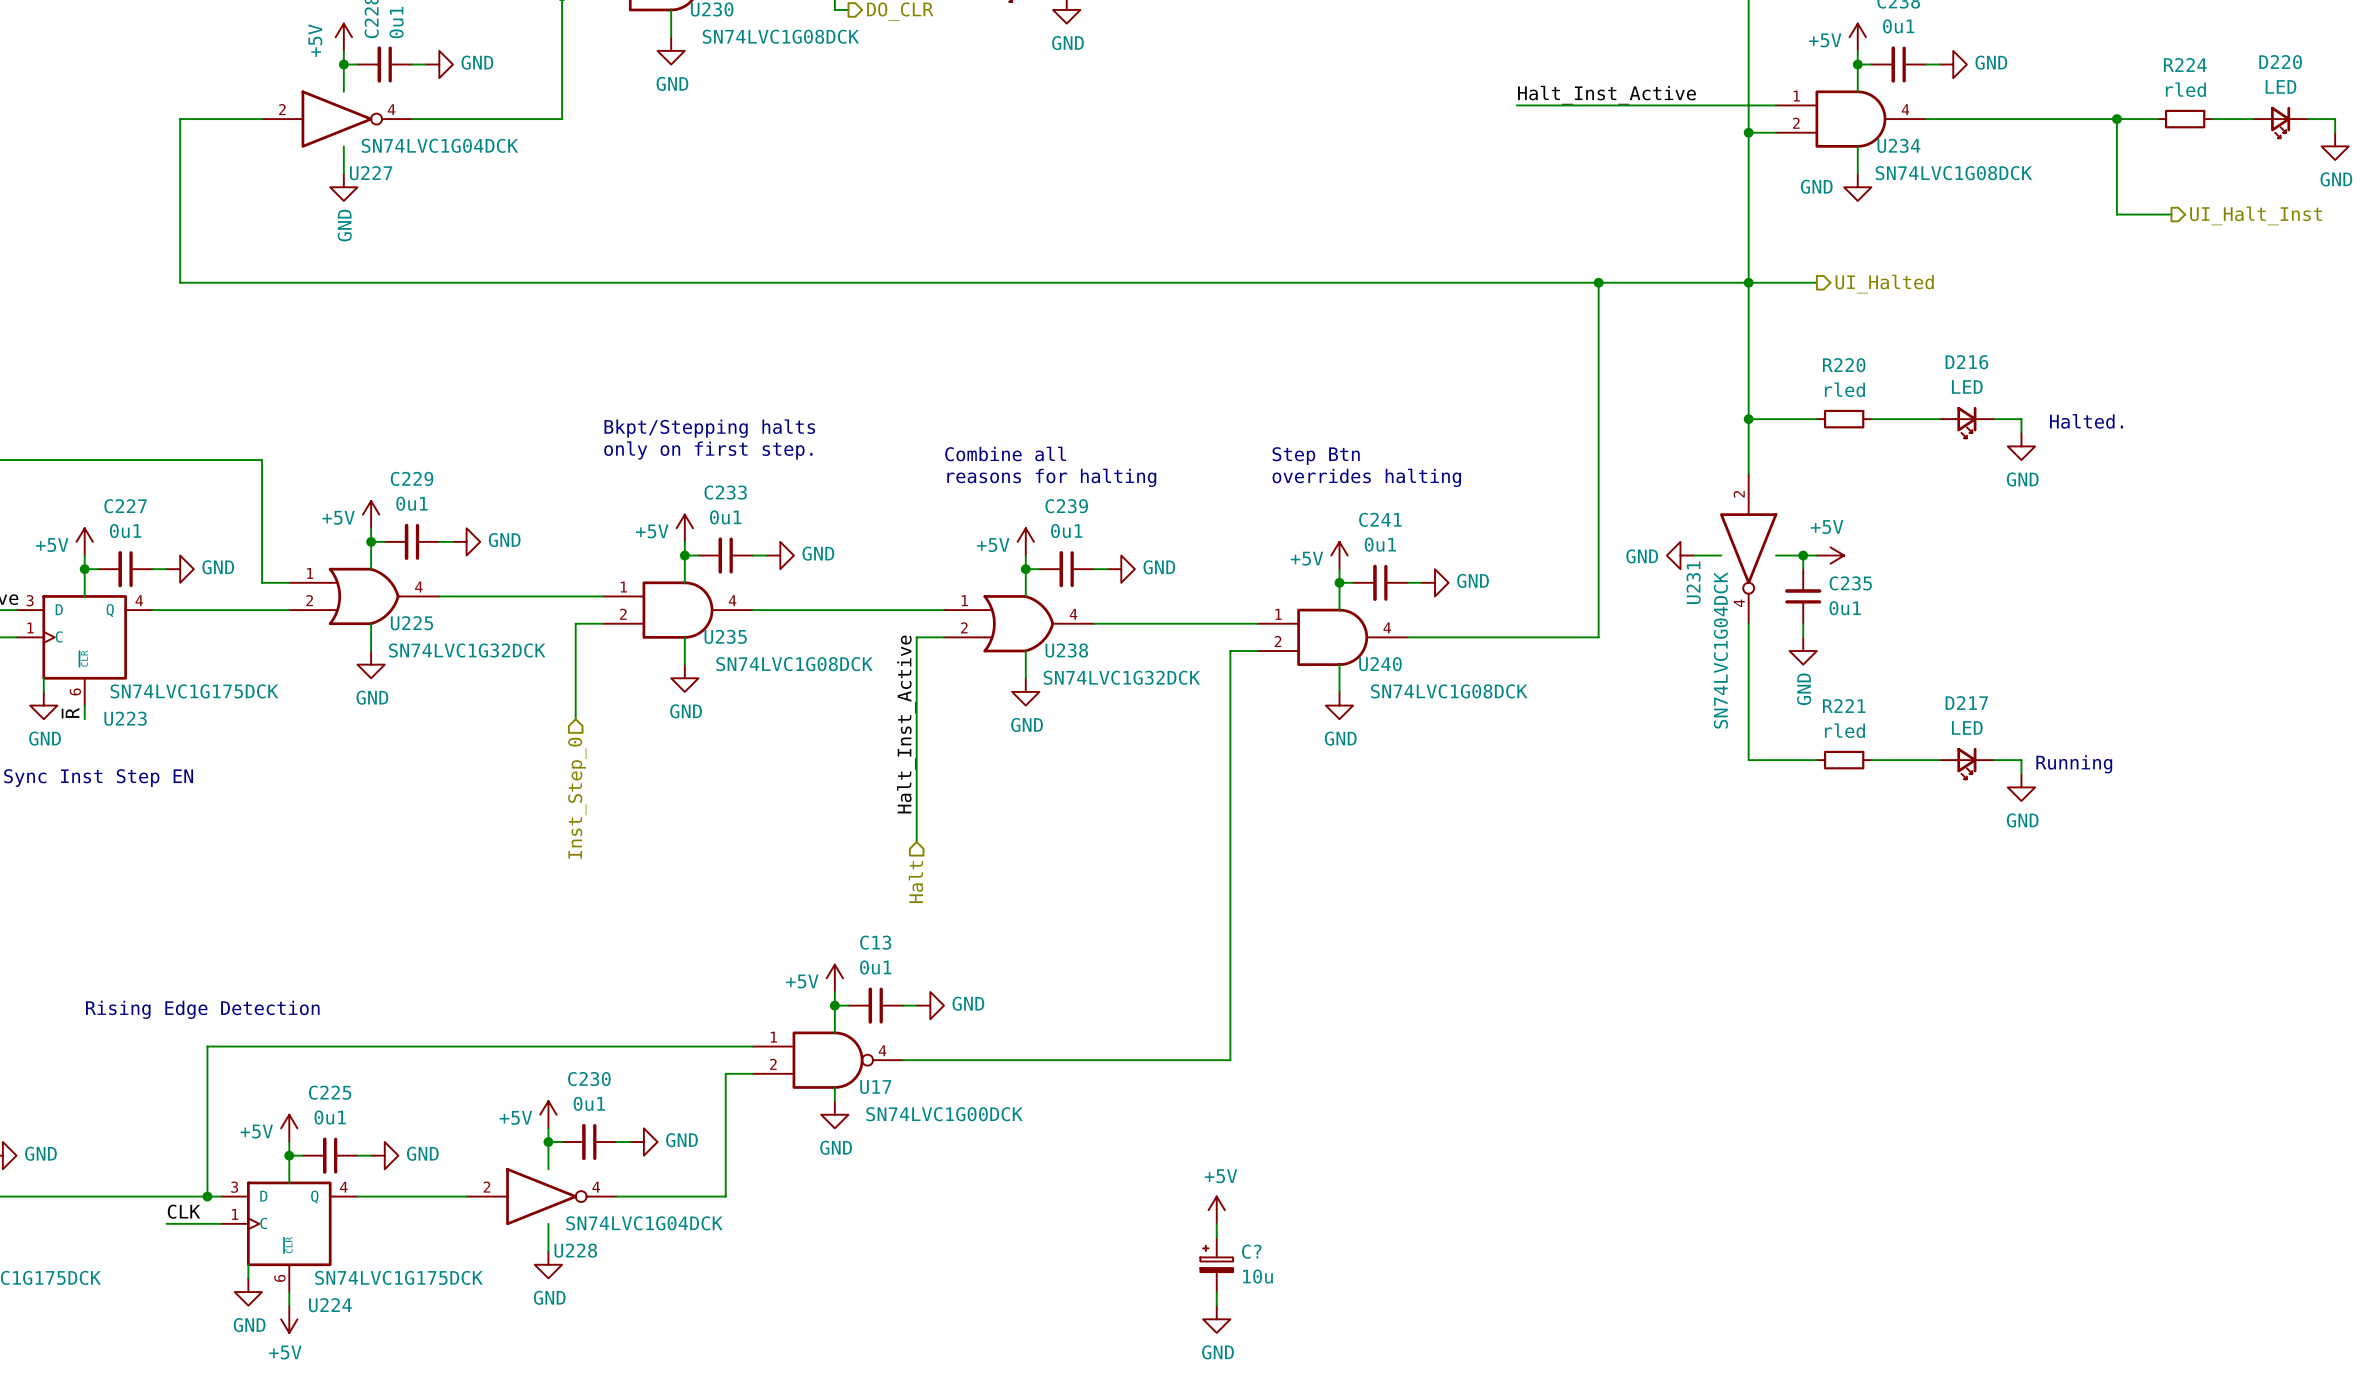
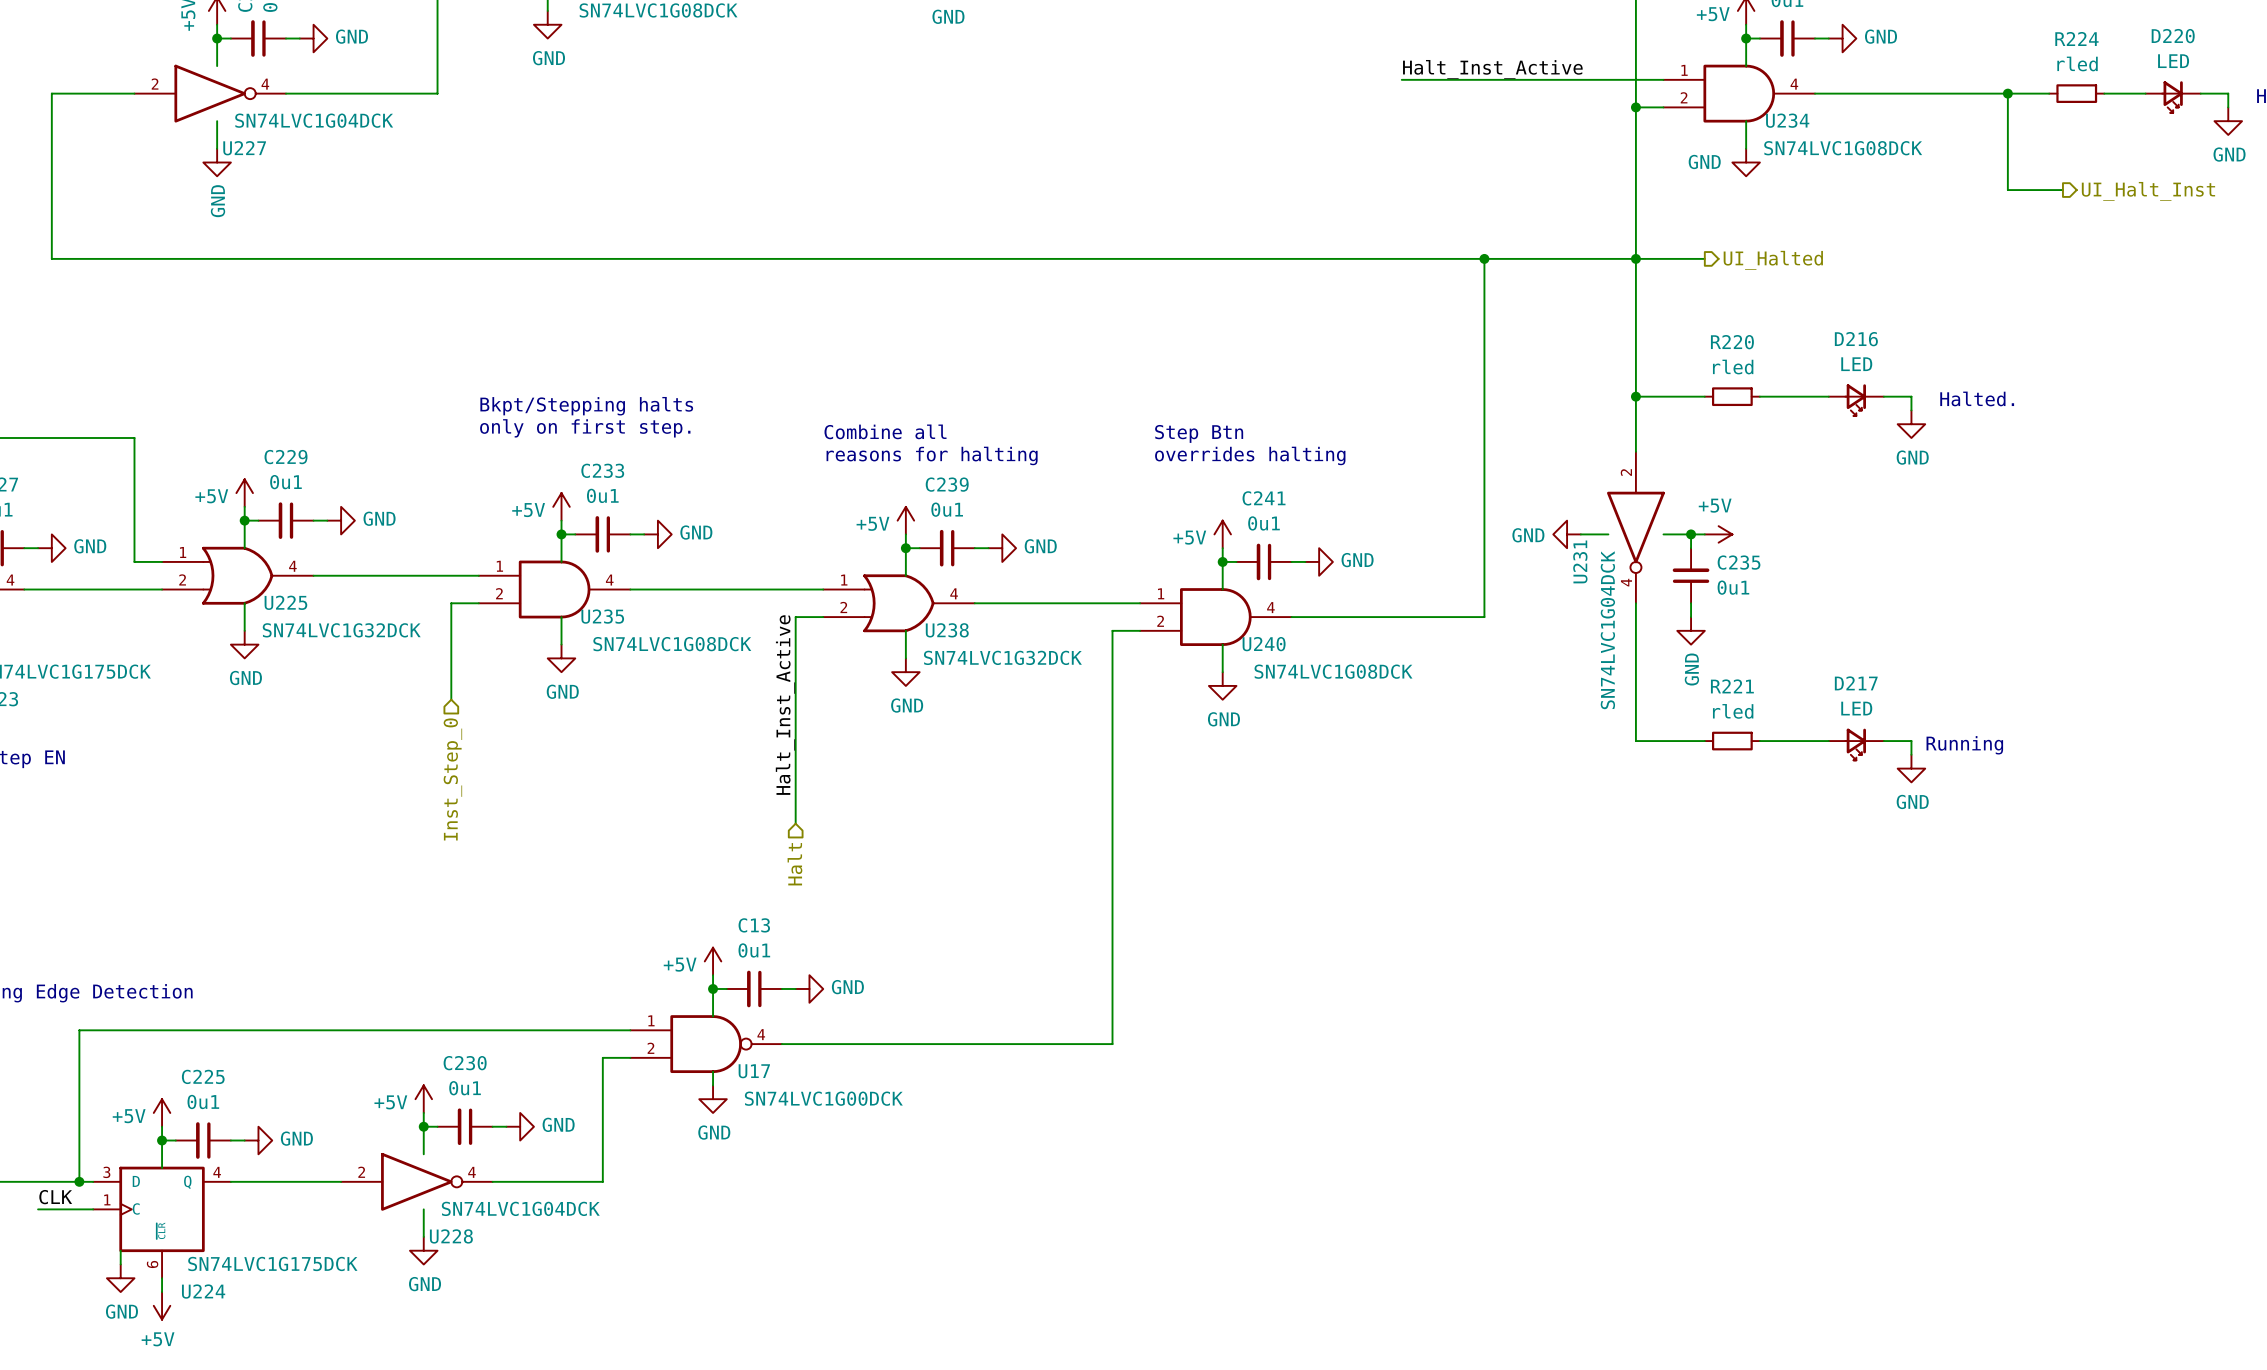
power symbol: +5V (1216, 1210) -> none
wire: (1216, 1223) (1216, 1237) -> none
C?: 10u (1216, 1264) -> none
wire: (1216, 1292) (1216, 1305) -> none
power symbol: GND (1216, 1319) -> none

